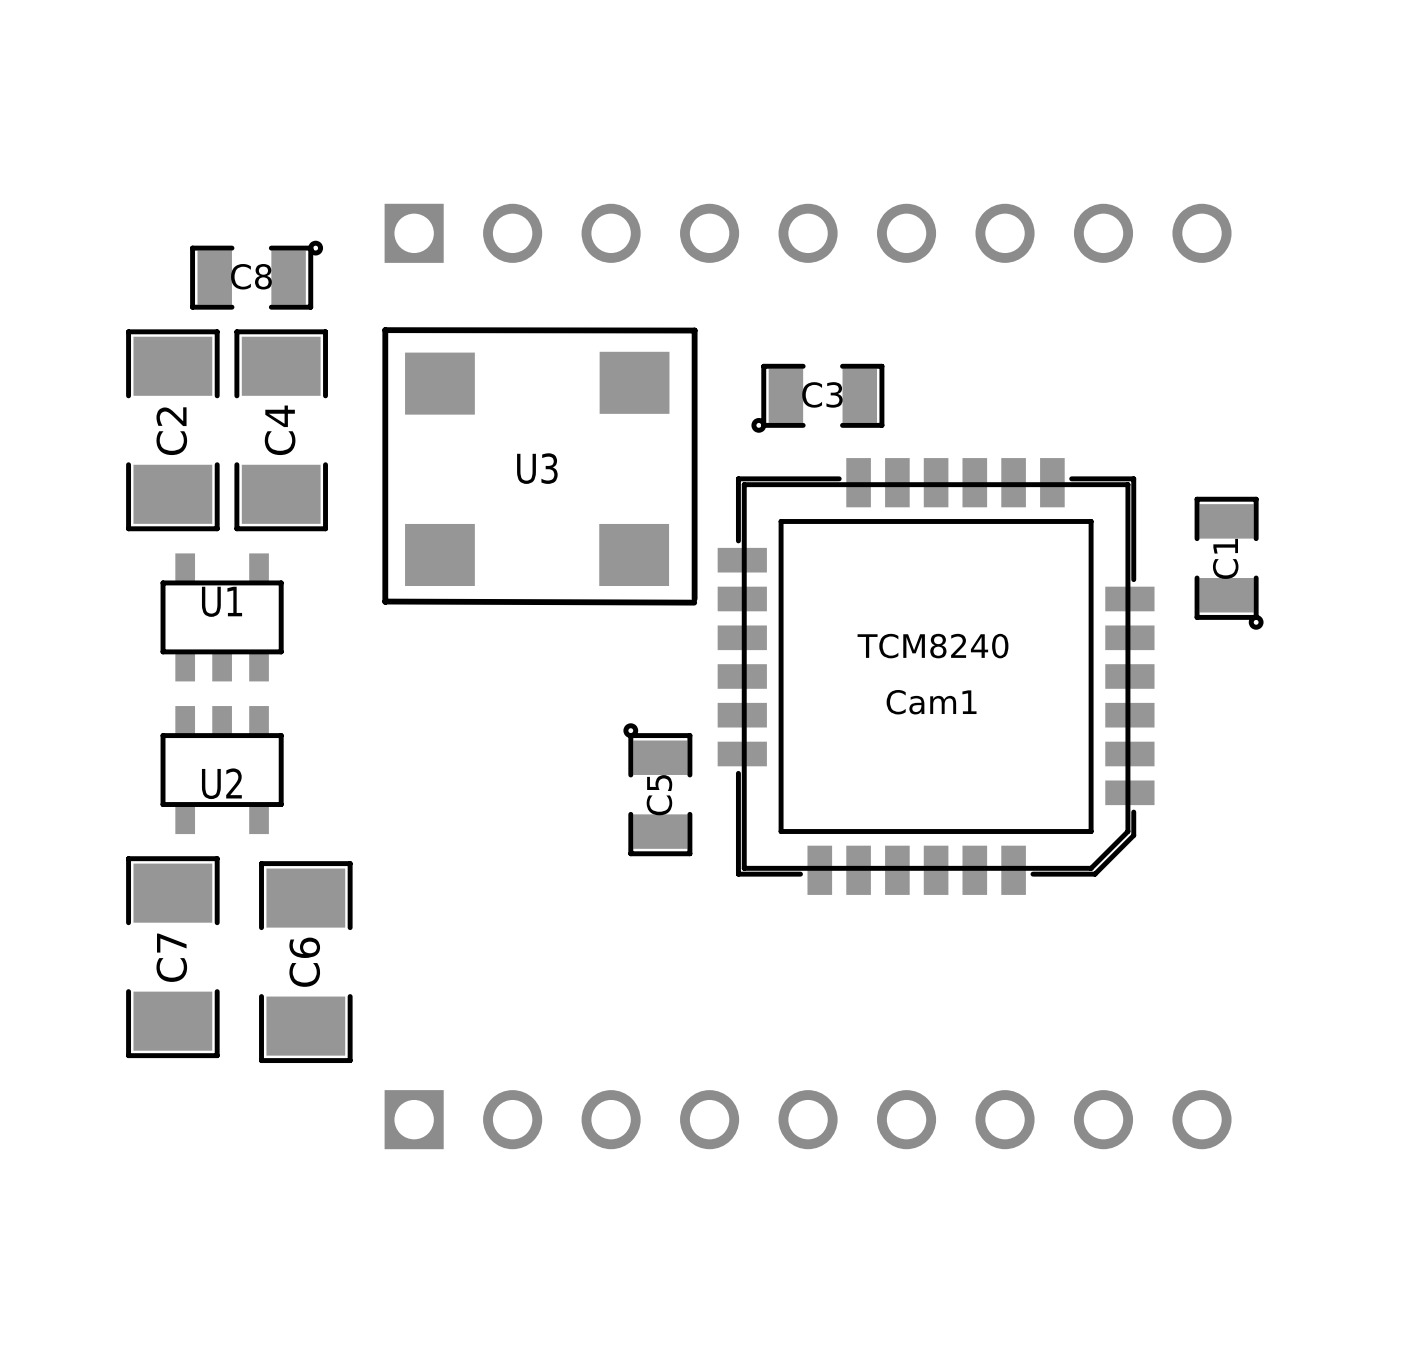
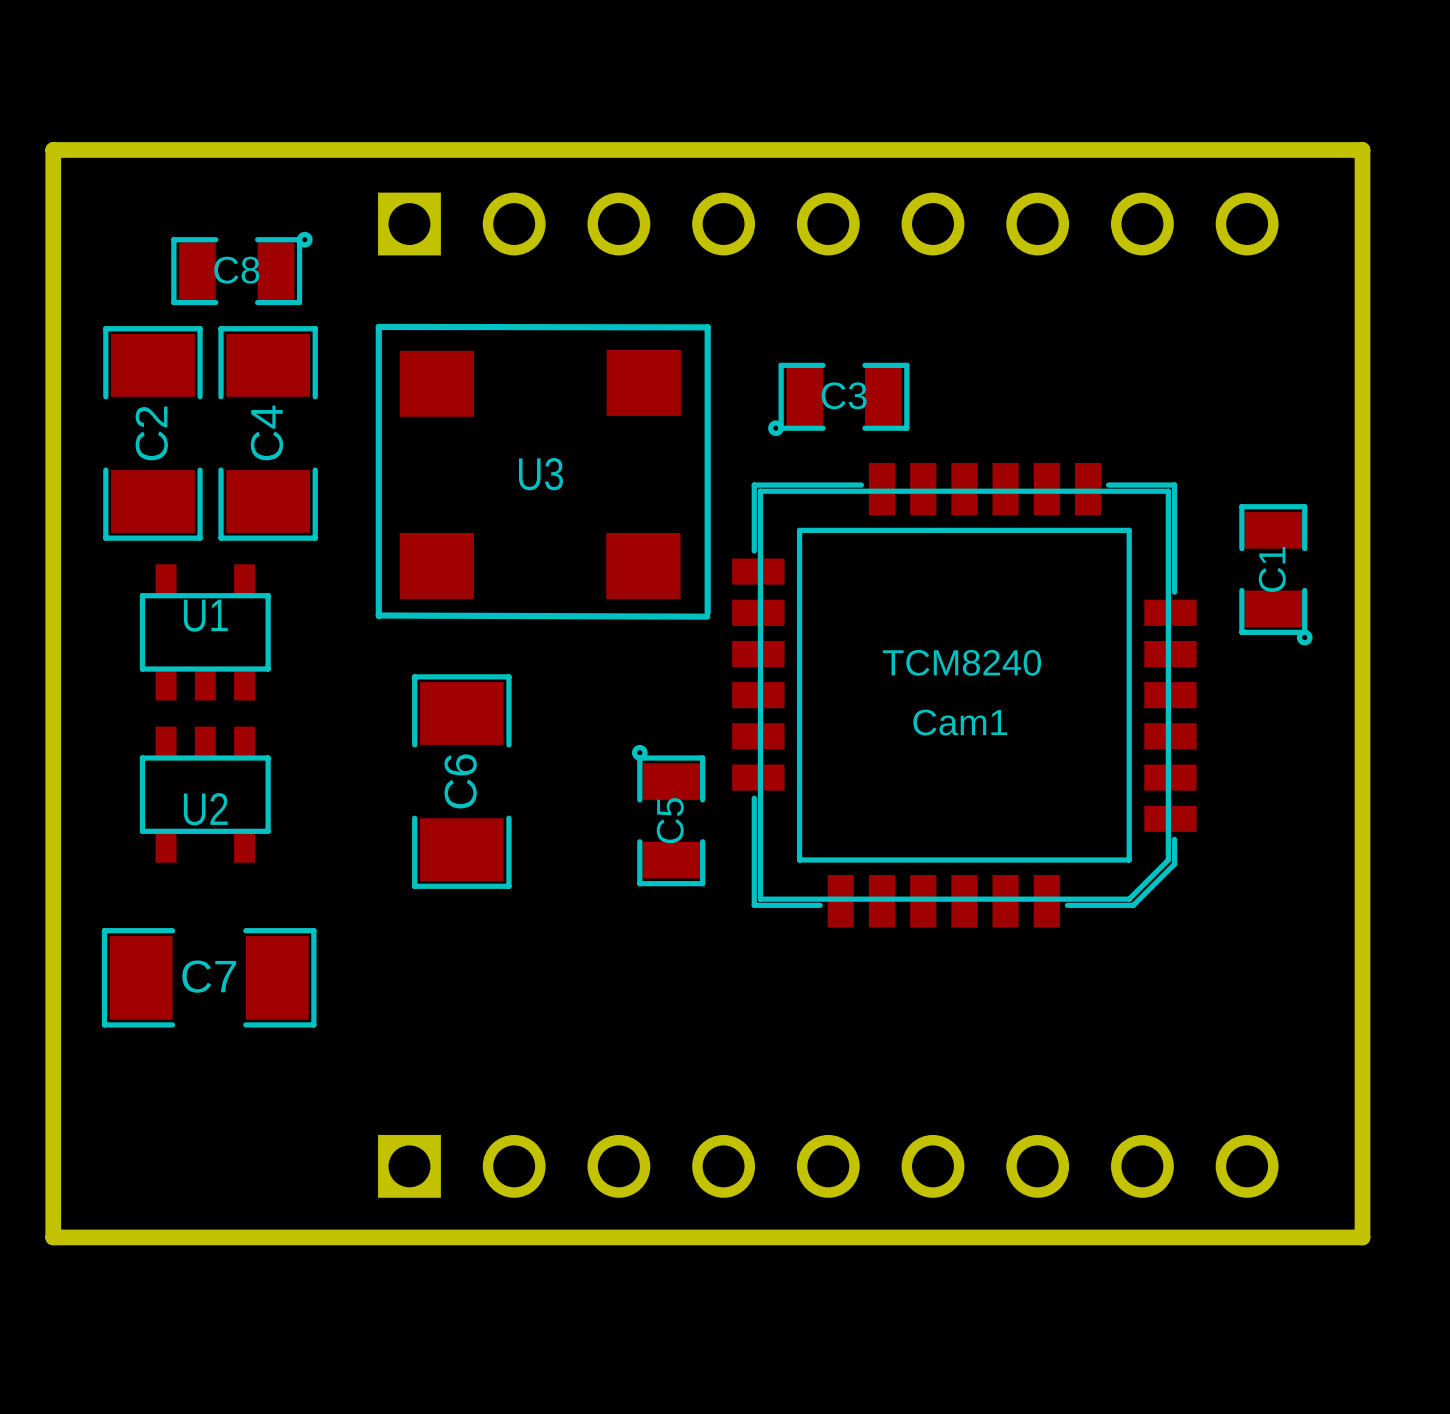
board edge: none -> (53, 149) (53, 1237) (1362, 1237) (1362, 149) (53, 149)
C7 rotation: 0° (172, 957) -> 90° clockwise (209, 977)
C6 position: (305, 962) -> (461, 781)

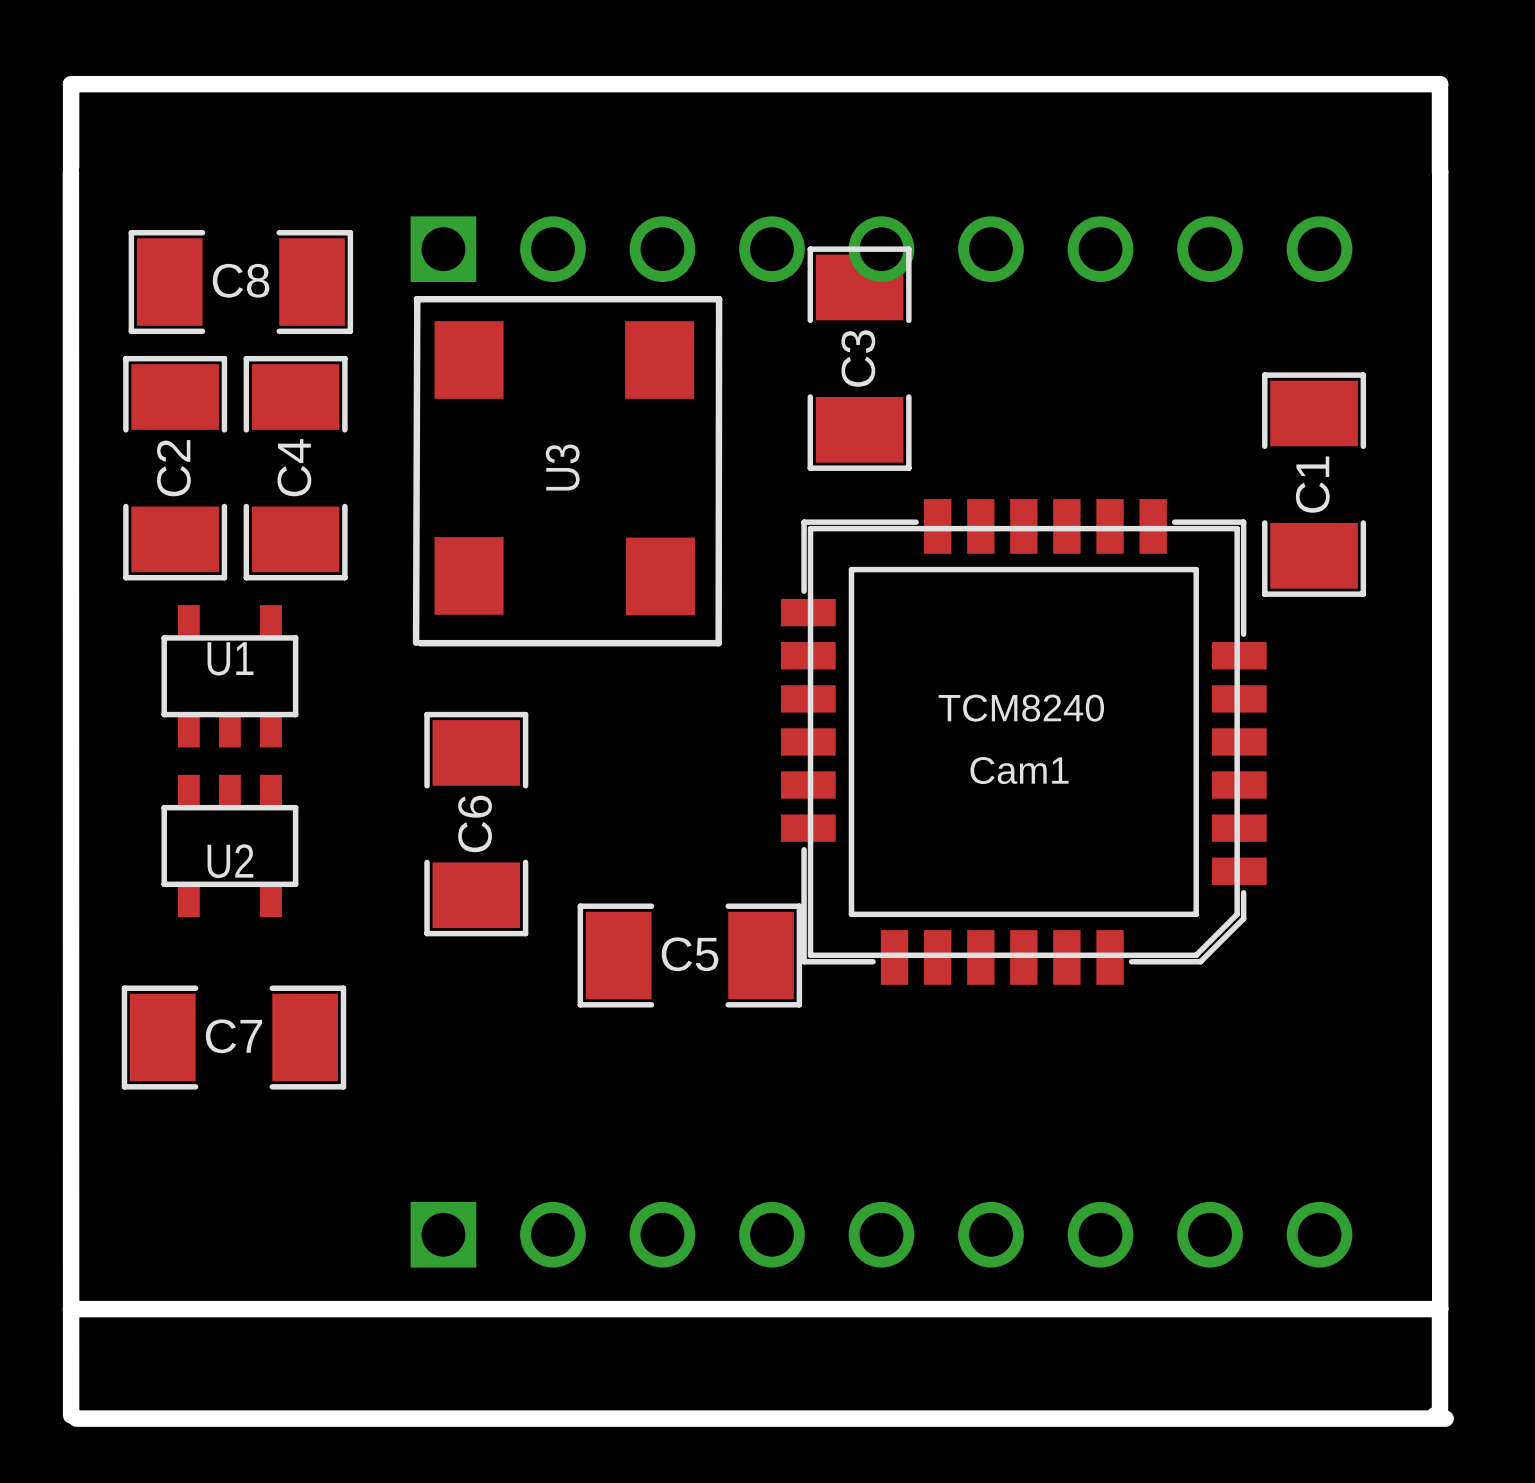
board edge: none -> (70, 84) (1440, 84)
board edge: none -> (71, 84) (71, 167)
board edge: none -> (70, 171) (71, 1415)
board edge: (1362, 149) (53, 149) (53, 1237) -> (1439, 172) (1439, 84)
C8 footprint: [171, 231, 313, 306] -> [128, 230, 354, 335]
C3 footprint: [768, 362, 910, 437] -> [807, 246, 912, 471]
U3 rotation: 0° (543, 471) -> 90° clockwise (567, 471)
C1 footprint: [1239, 504, 1313, 646] -> [1262, 372, 1367, 597]
C5 footprint: [631, 744, 706, 887] -> [577, 903, 803, 1008]
C6 position: (461, 781) -> (476, 824)
board edge: none -> (1439, 1311) (1439, 1415) (1434, 1415)
board edge: none -> (76, 1418) (1445, 1418)

